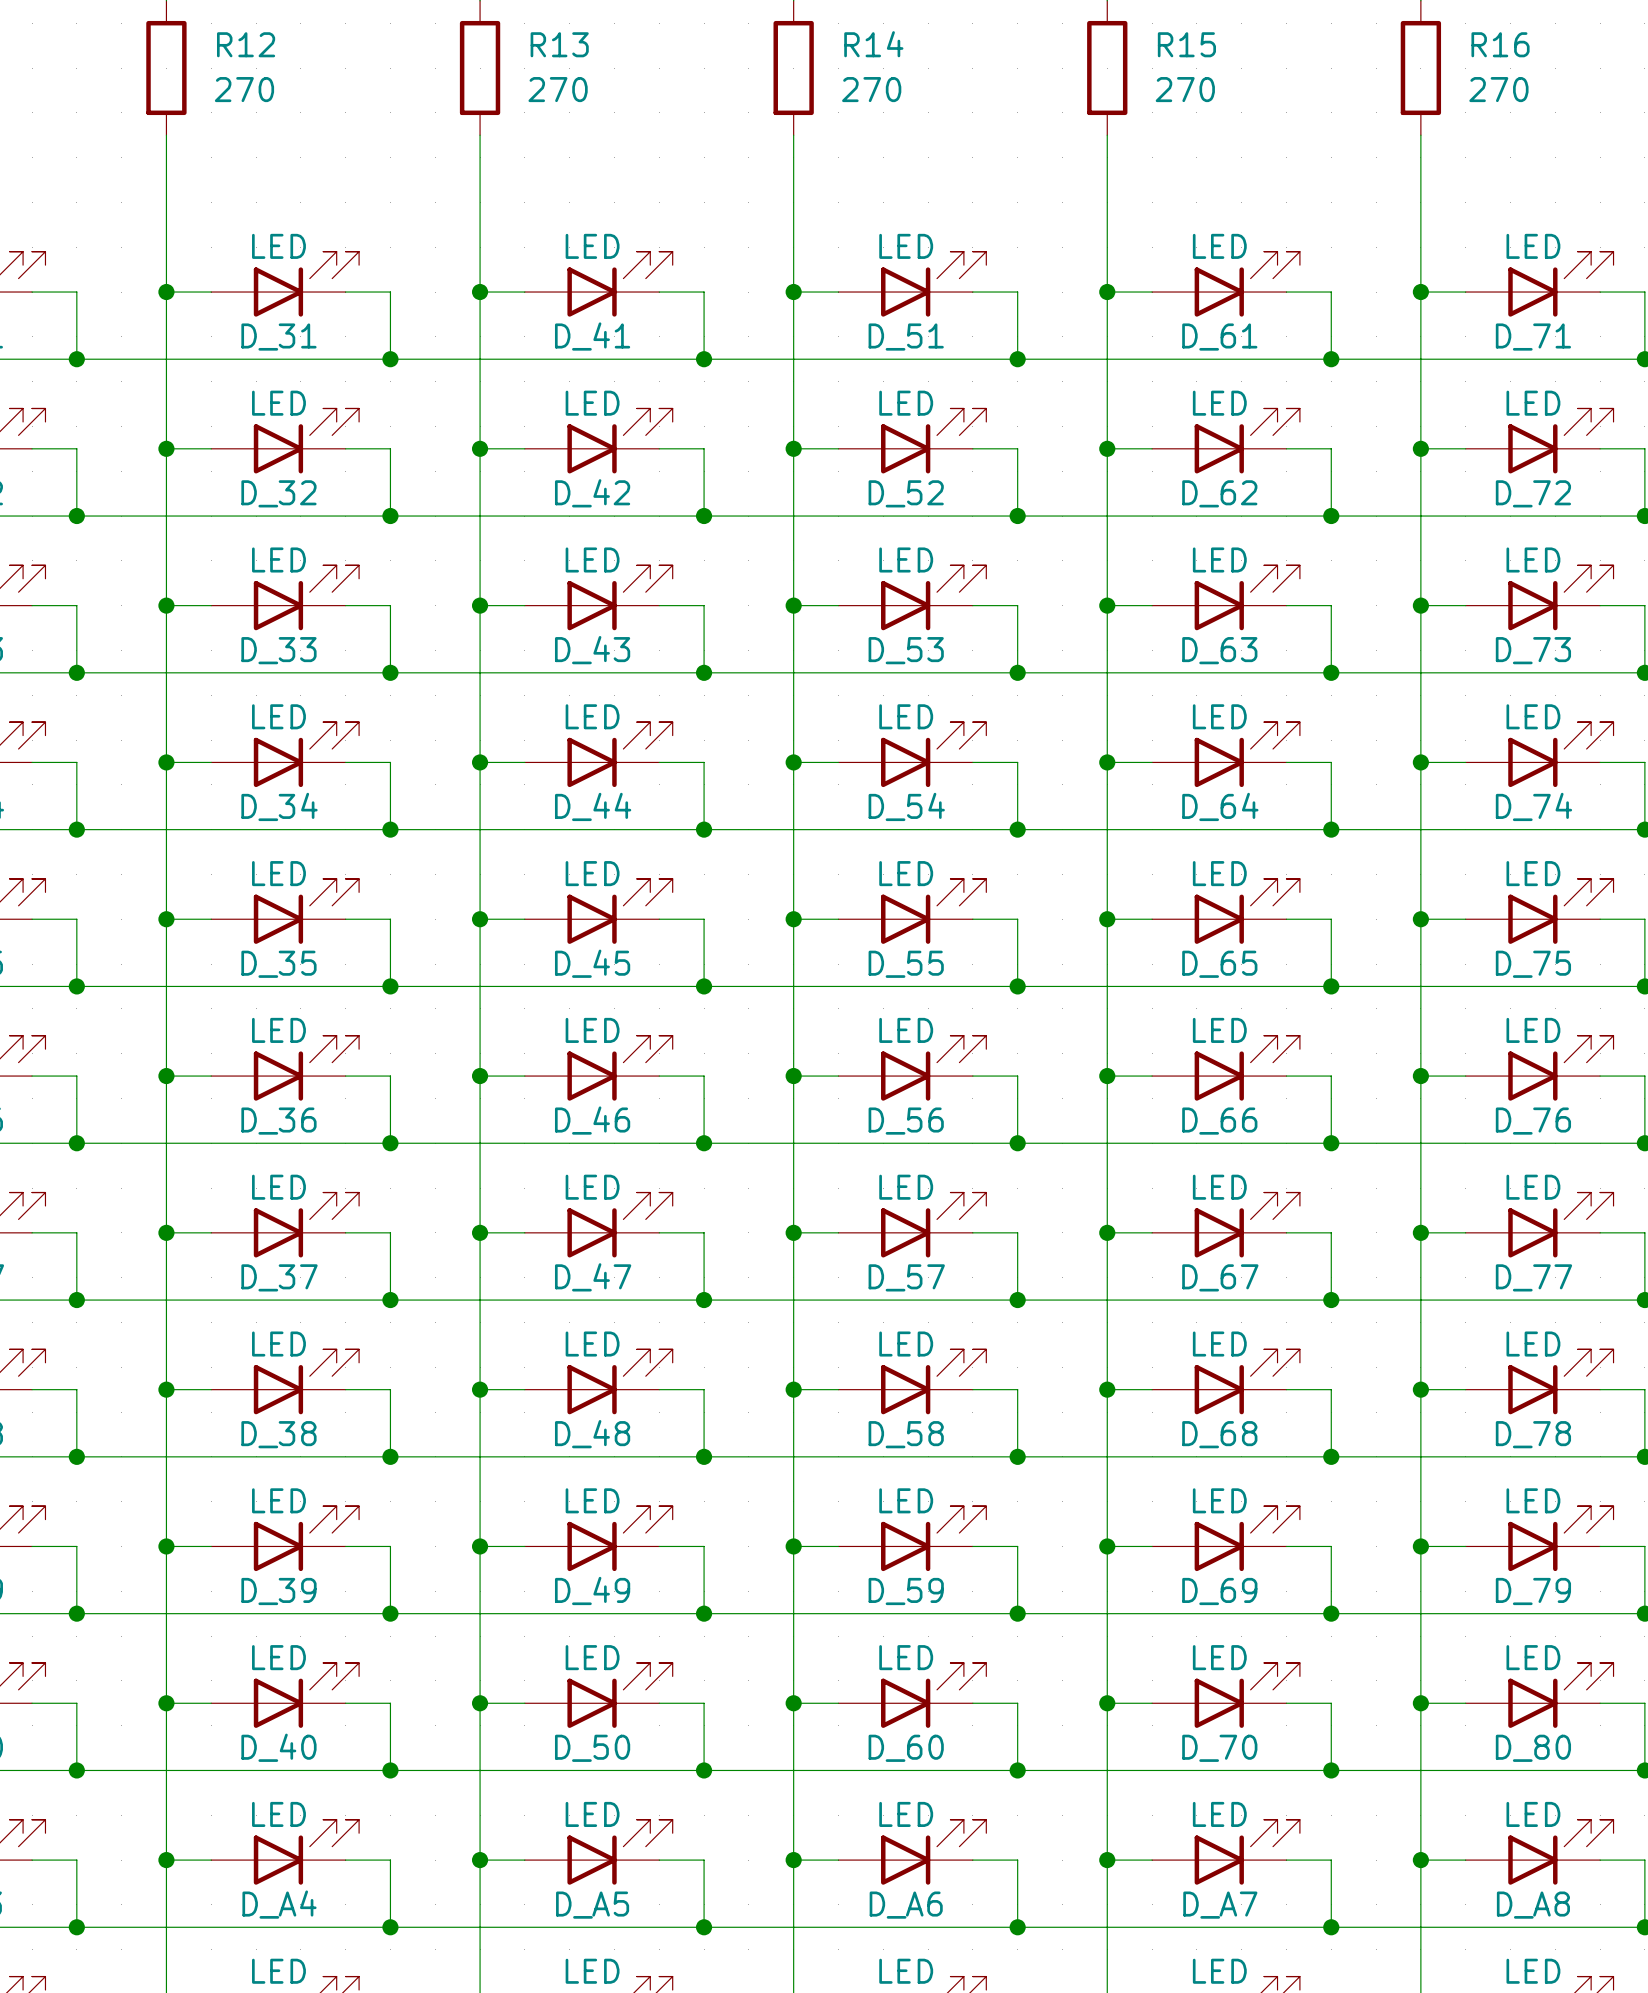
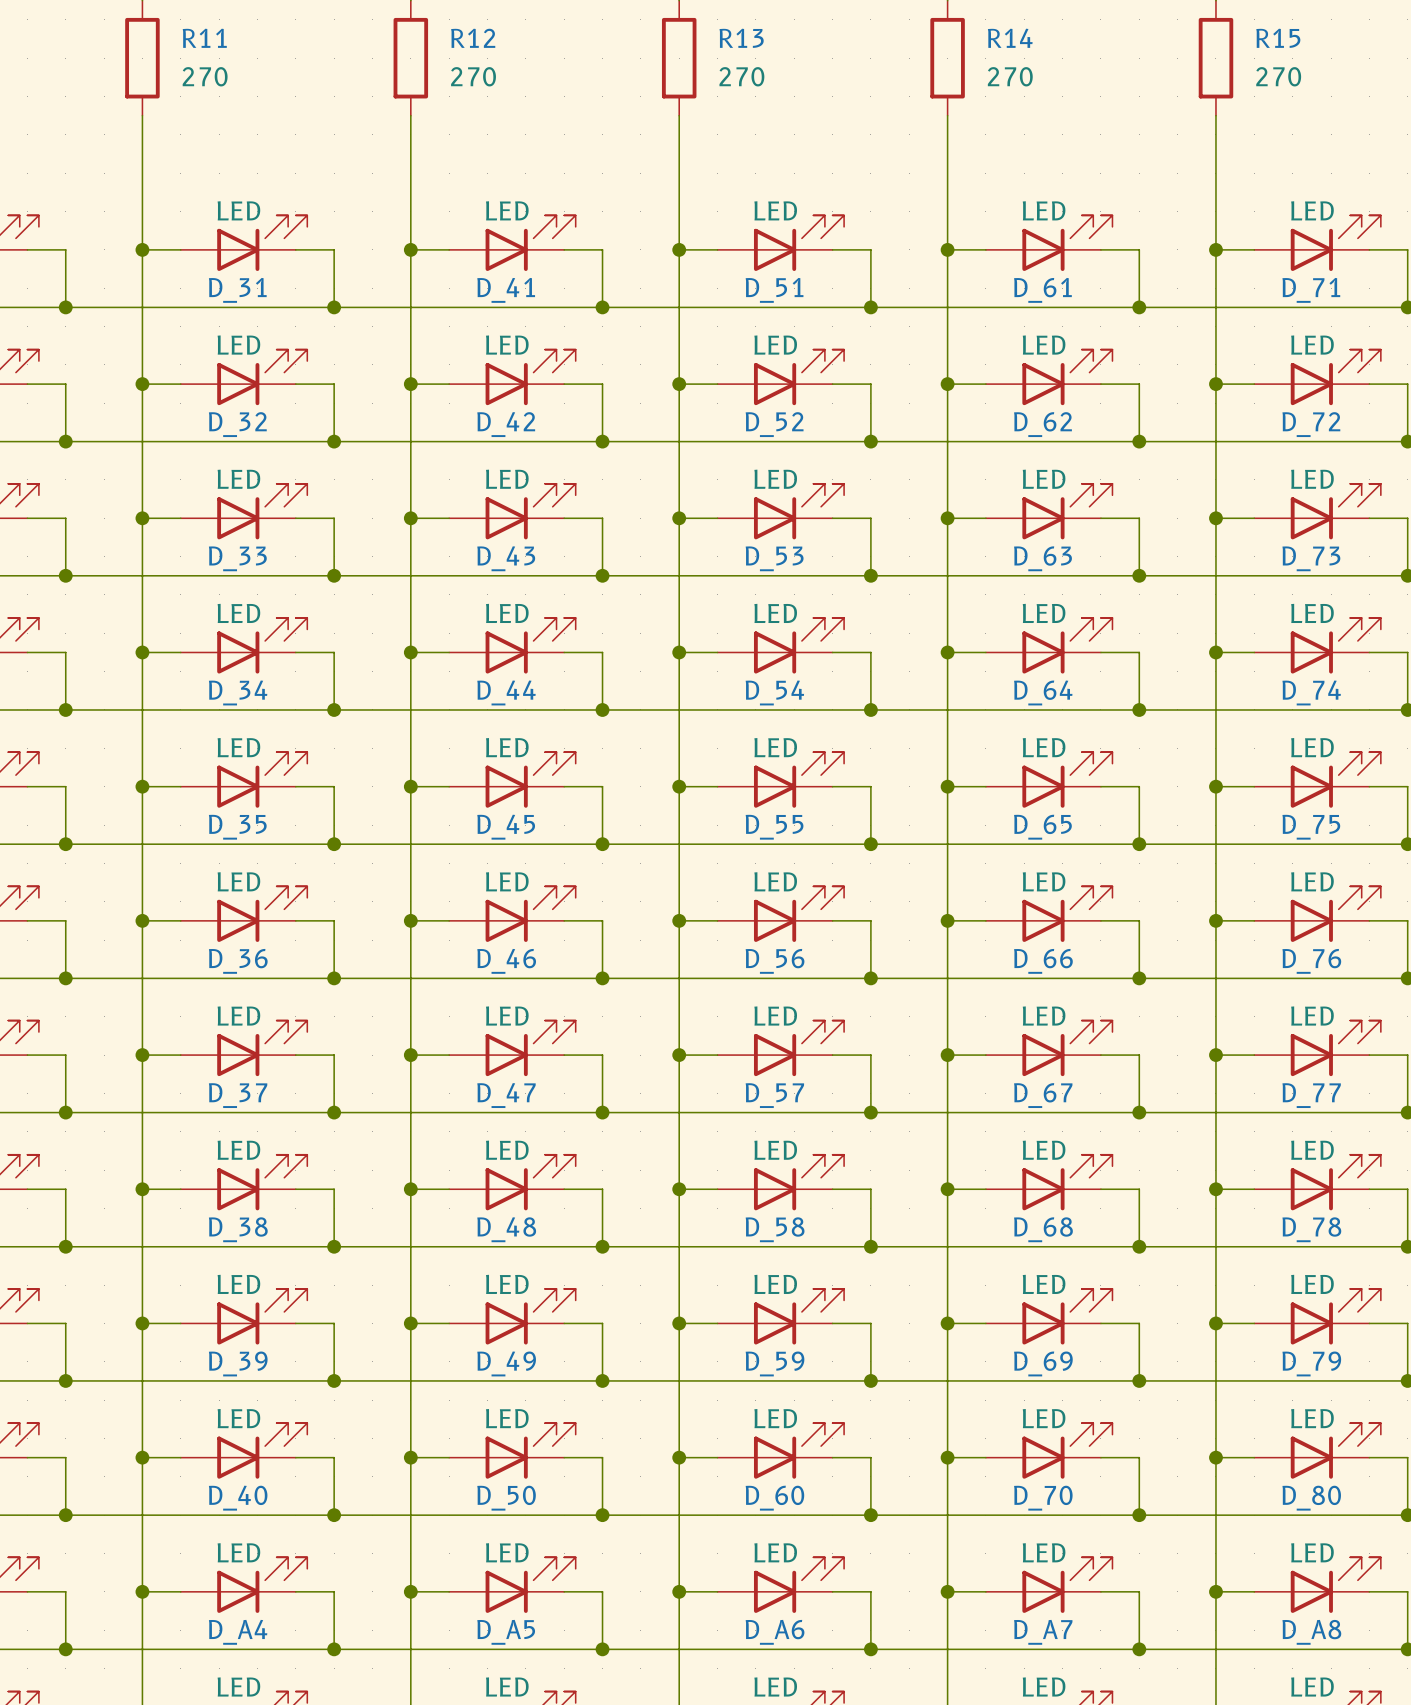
R12 name: R12 (246, 44) -> R11 (204, 38)
R13 name: R13 (559, 44) -> R12 (473, 38)
R14 name: R14 (873, 44) -> R13 (741, 38)
R15 name: R15 (1186, 44) -> R14 (1010, 38)
R16 name: R16 (1500, 44) -> R15 (1278, 38)

